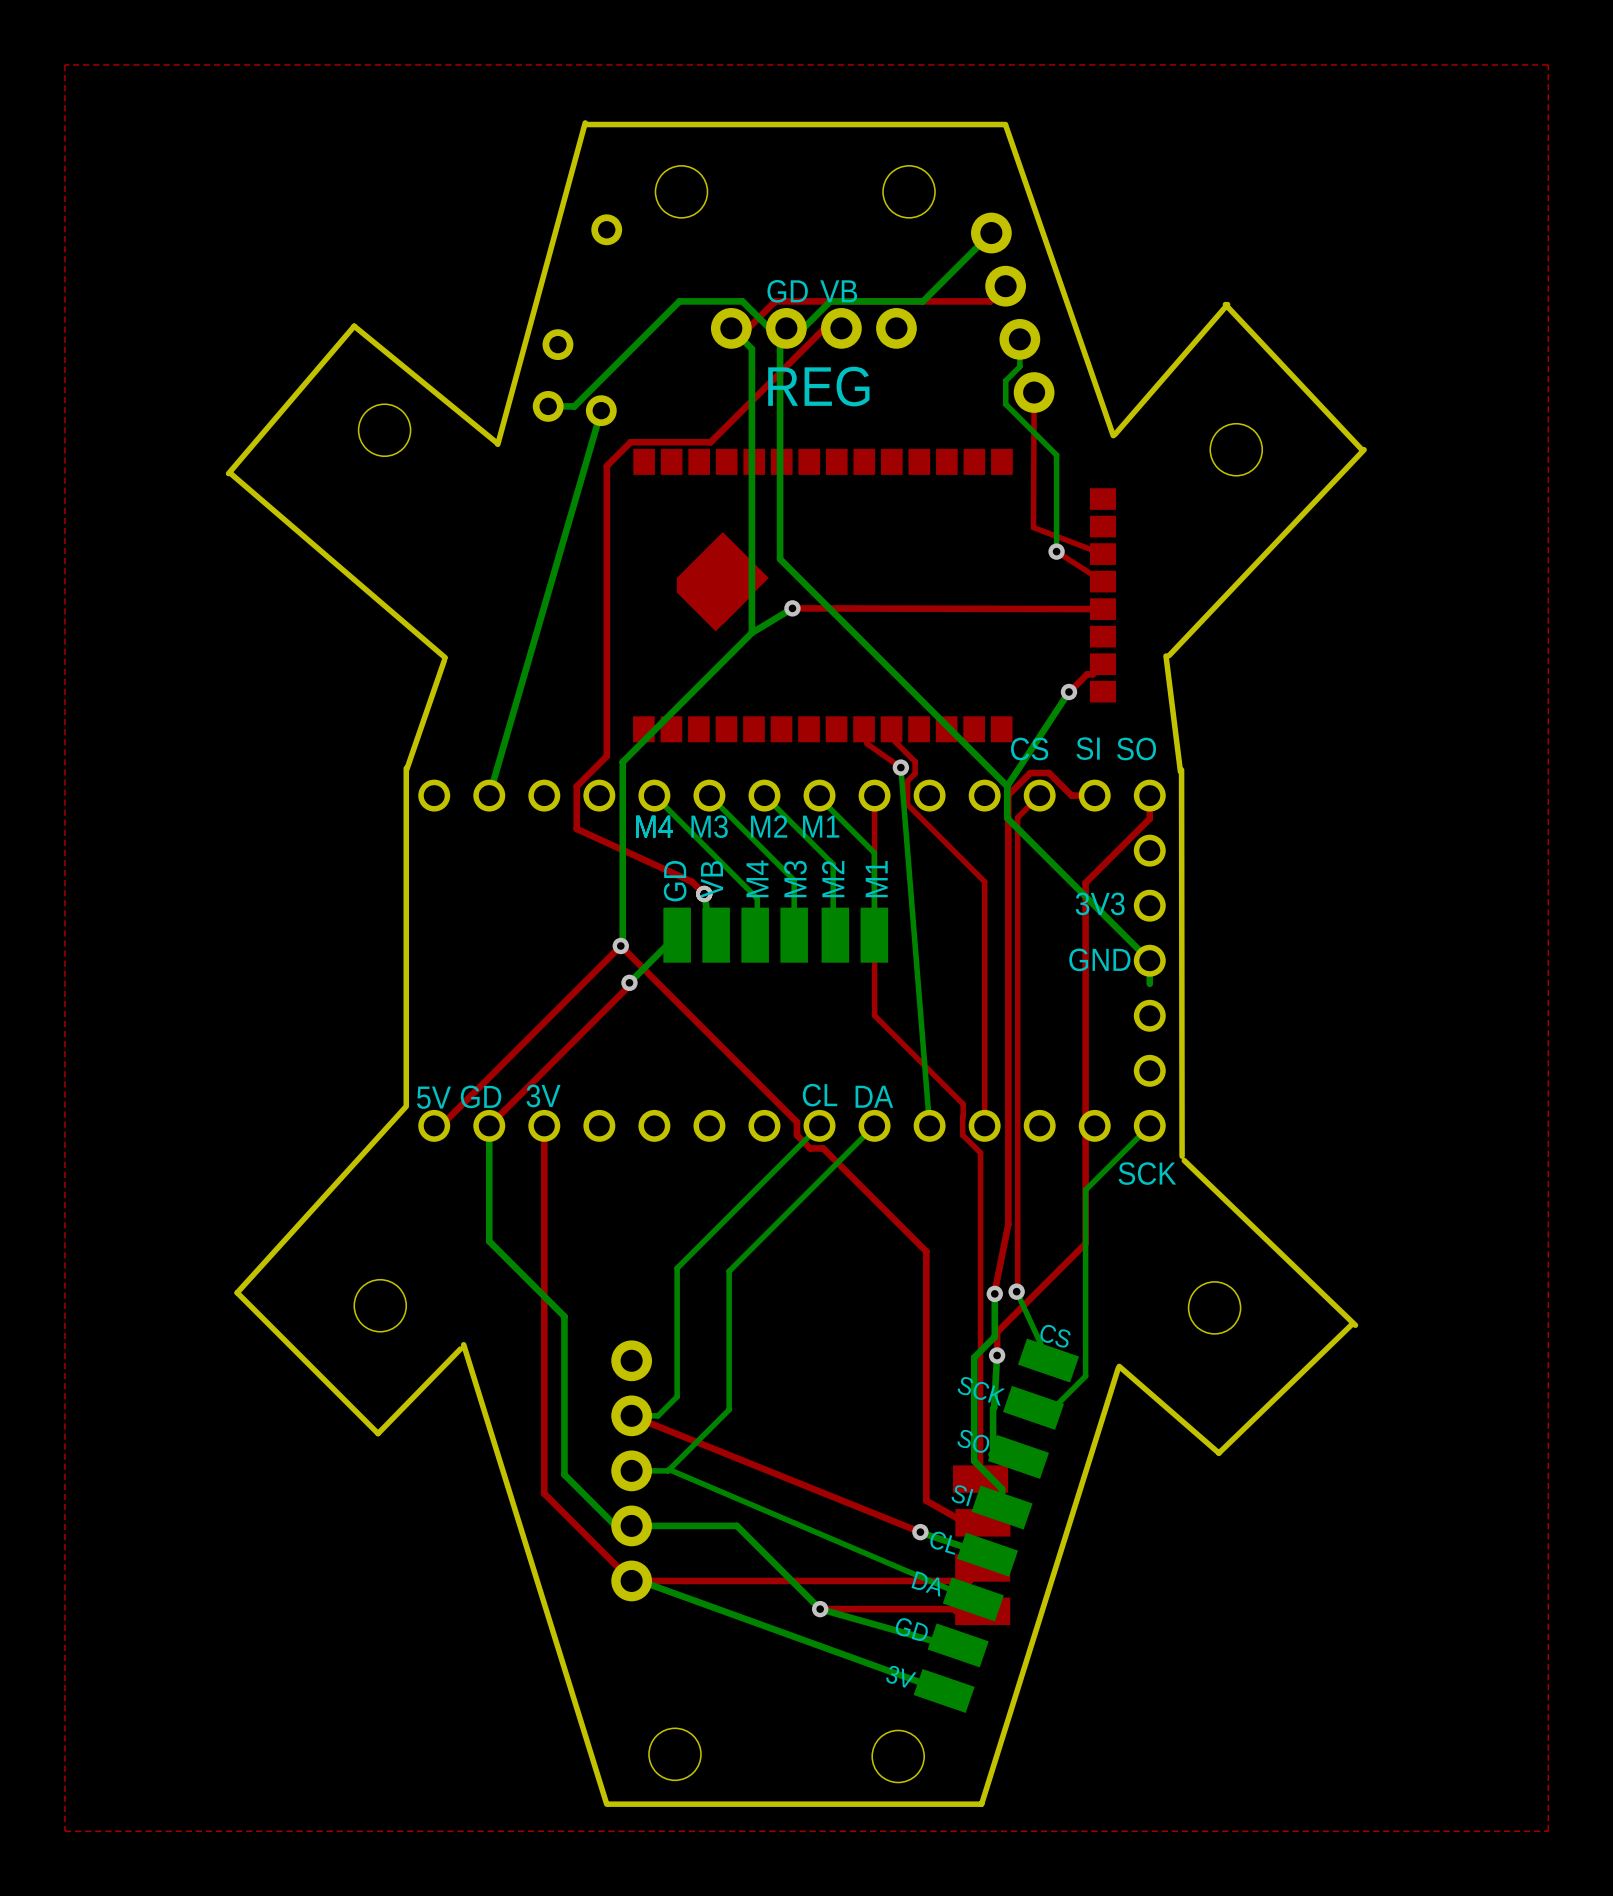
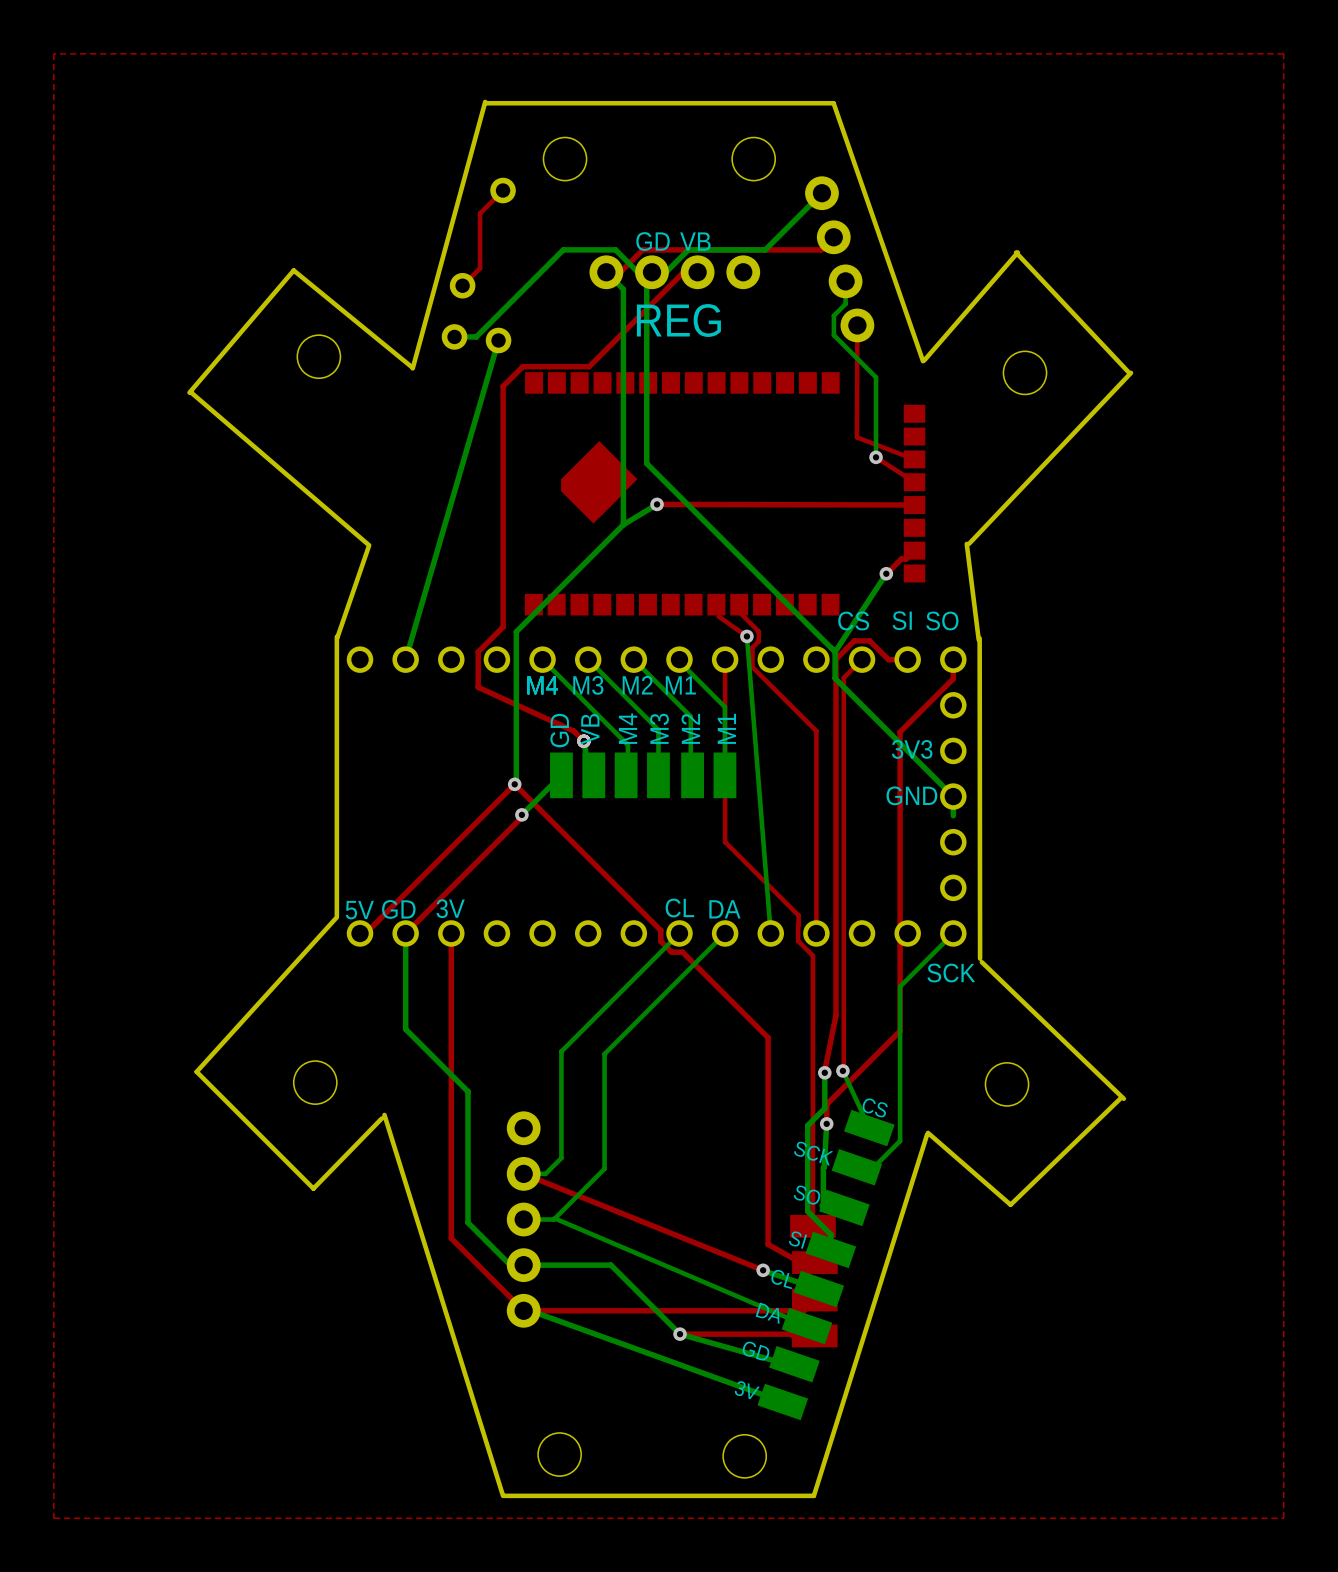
top track: none -> (503, 190) (480, 213) (480, 268) (462, 285)

